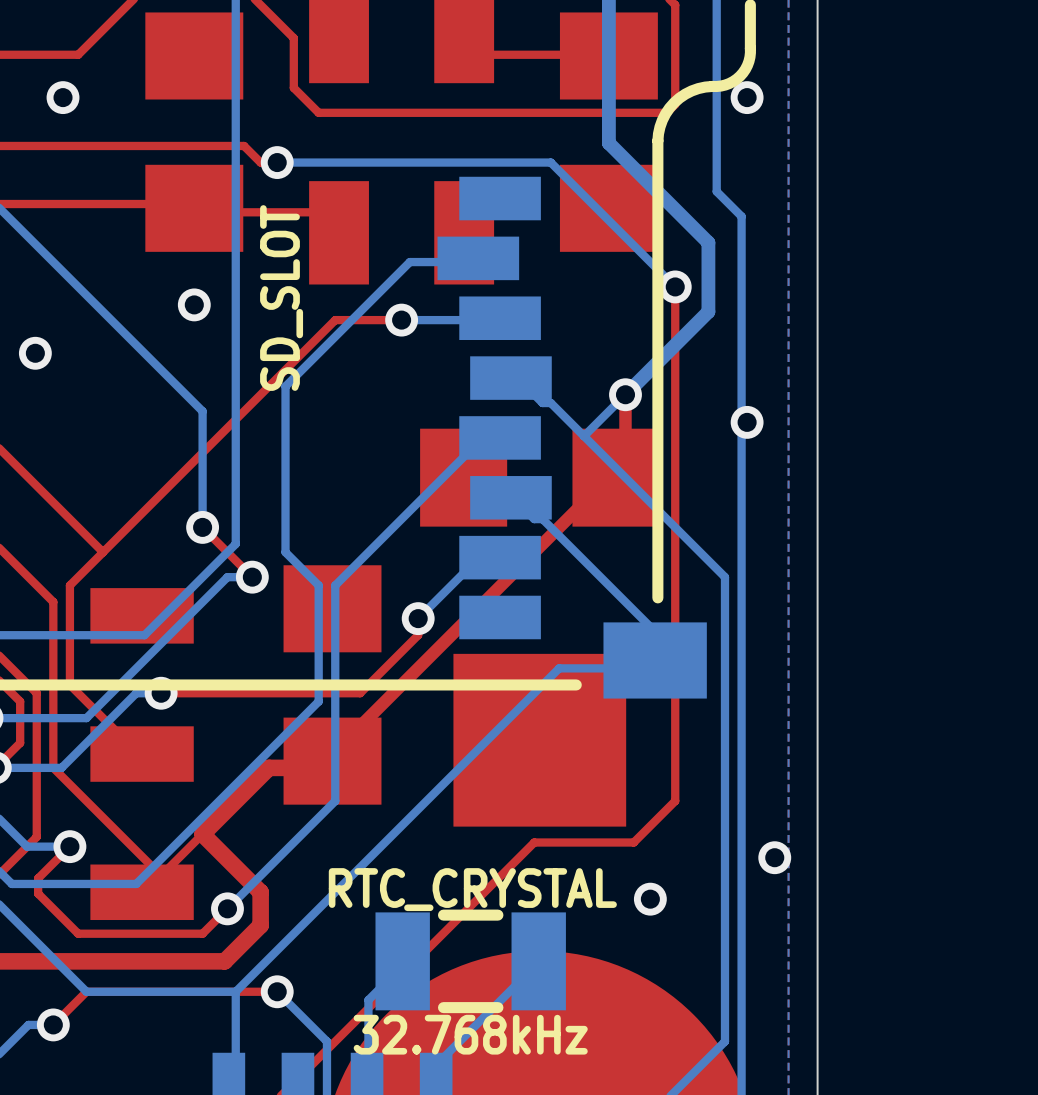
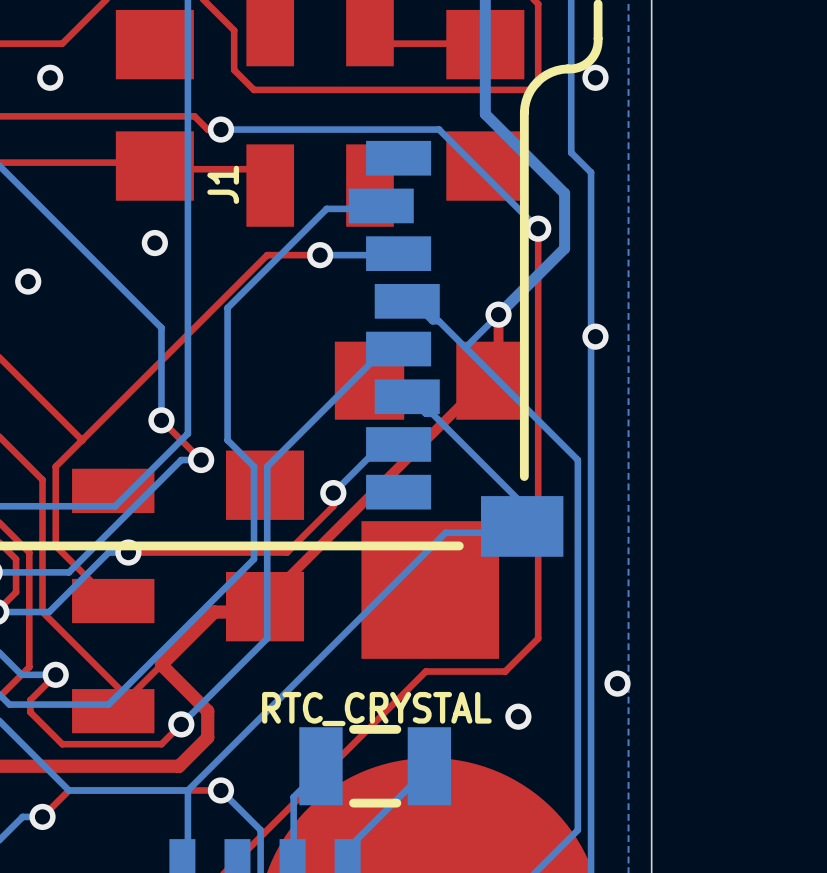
SD_SLOT name: SD_SLOT (281, 298) -> J1 (223, 184)
RTC_CRYSTAL value: 32.768kHz (470, 1034) -> none

